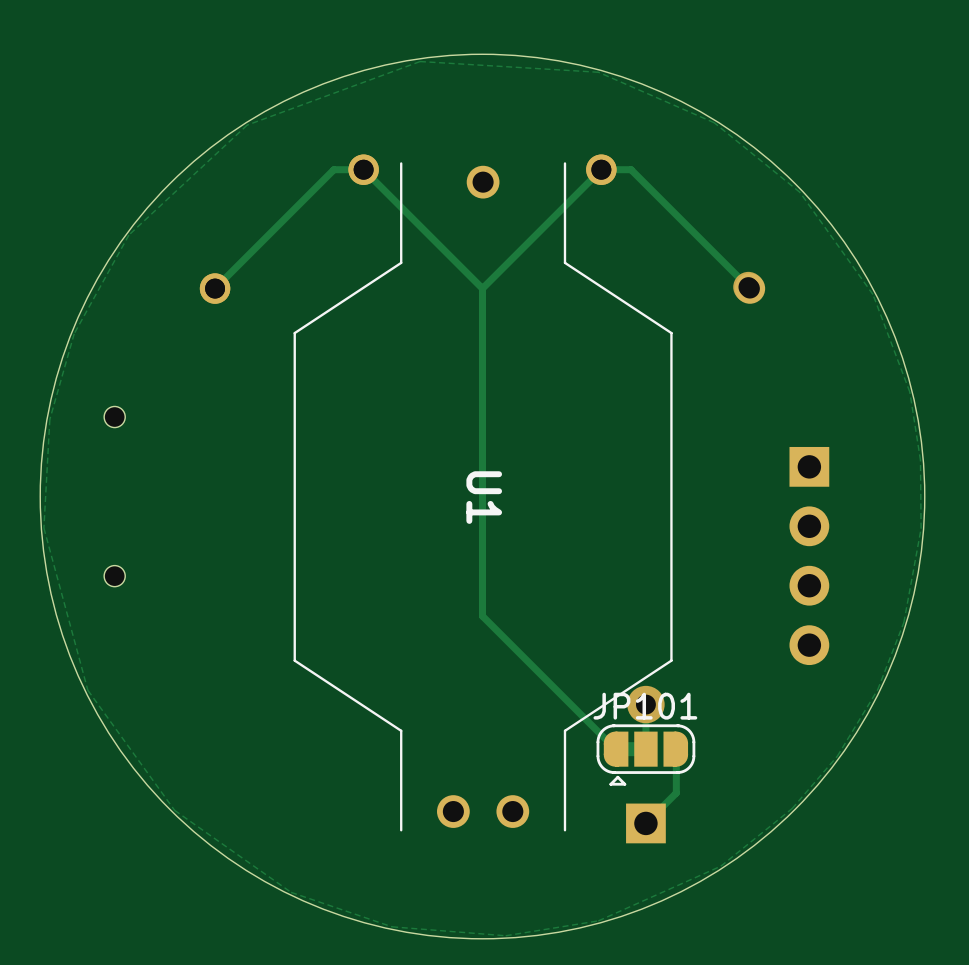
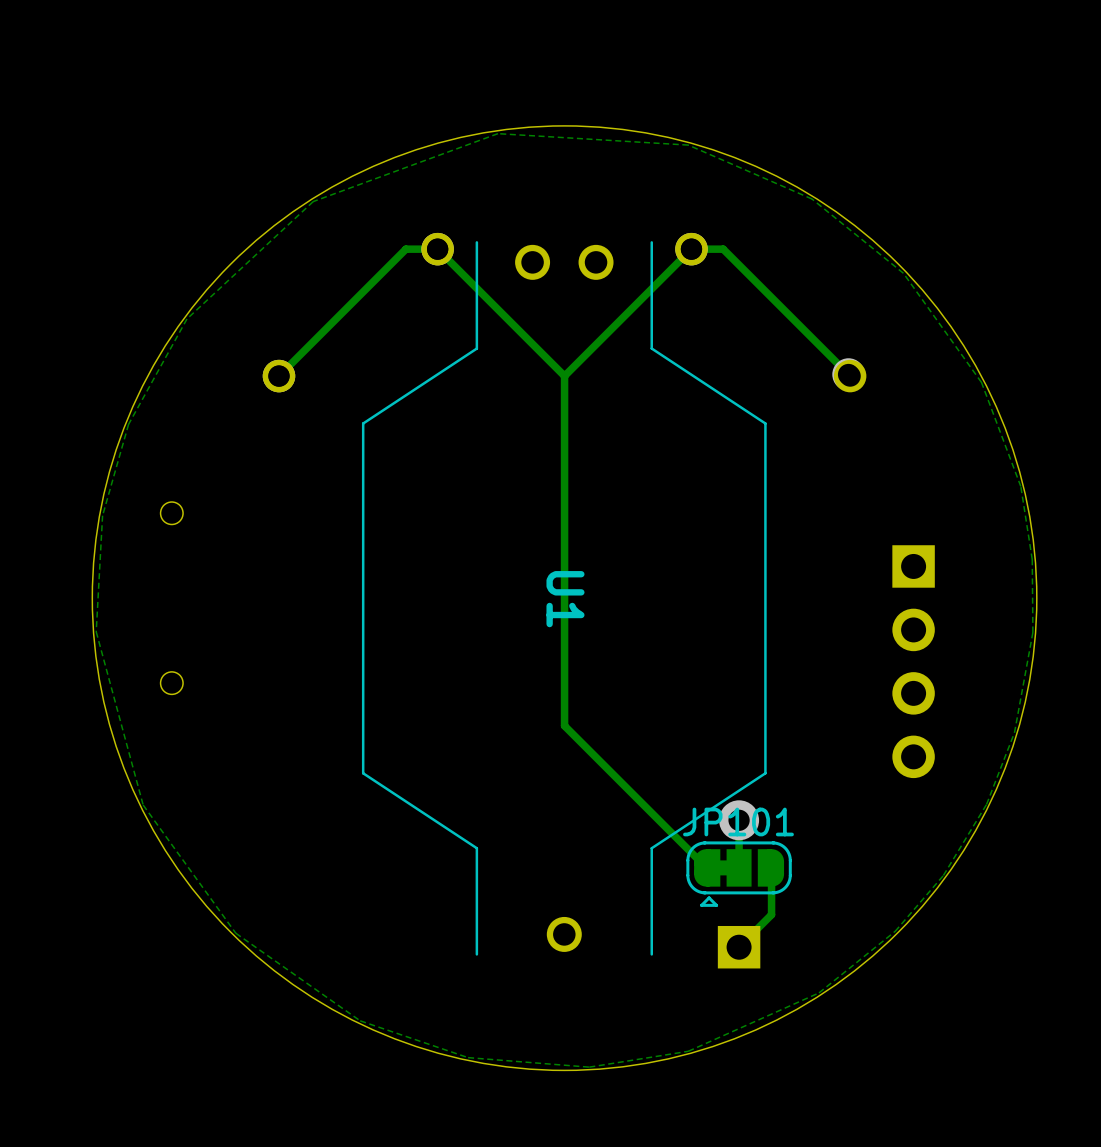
U1 rotation: 0° (483, 496) -> 180° (564, 598)

